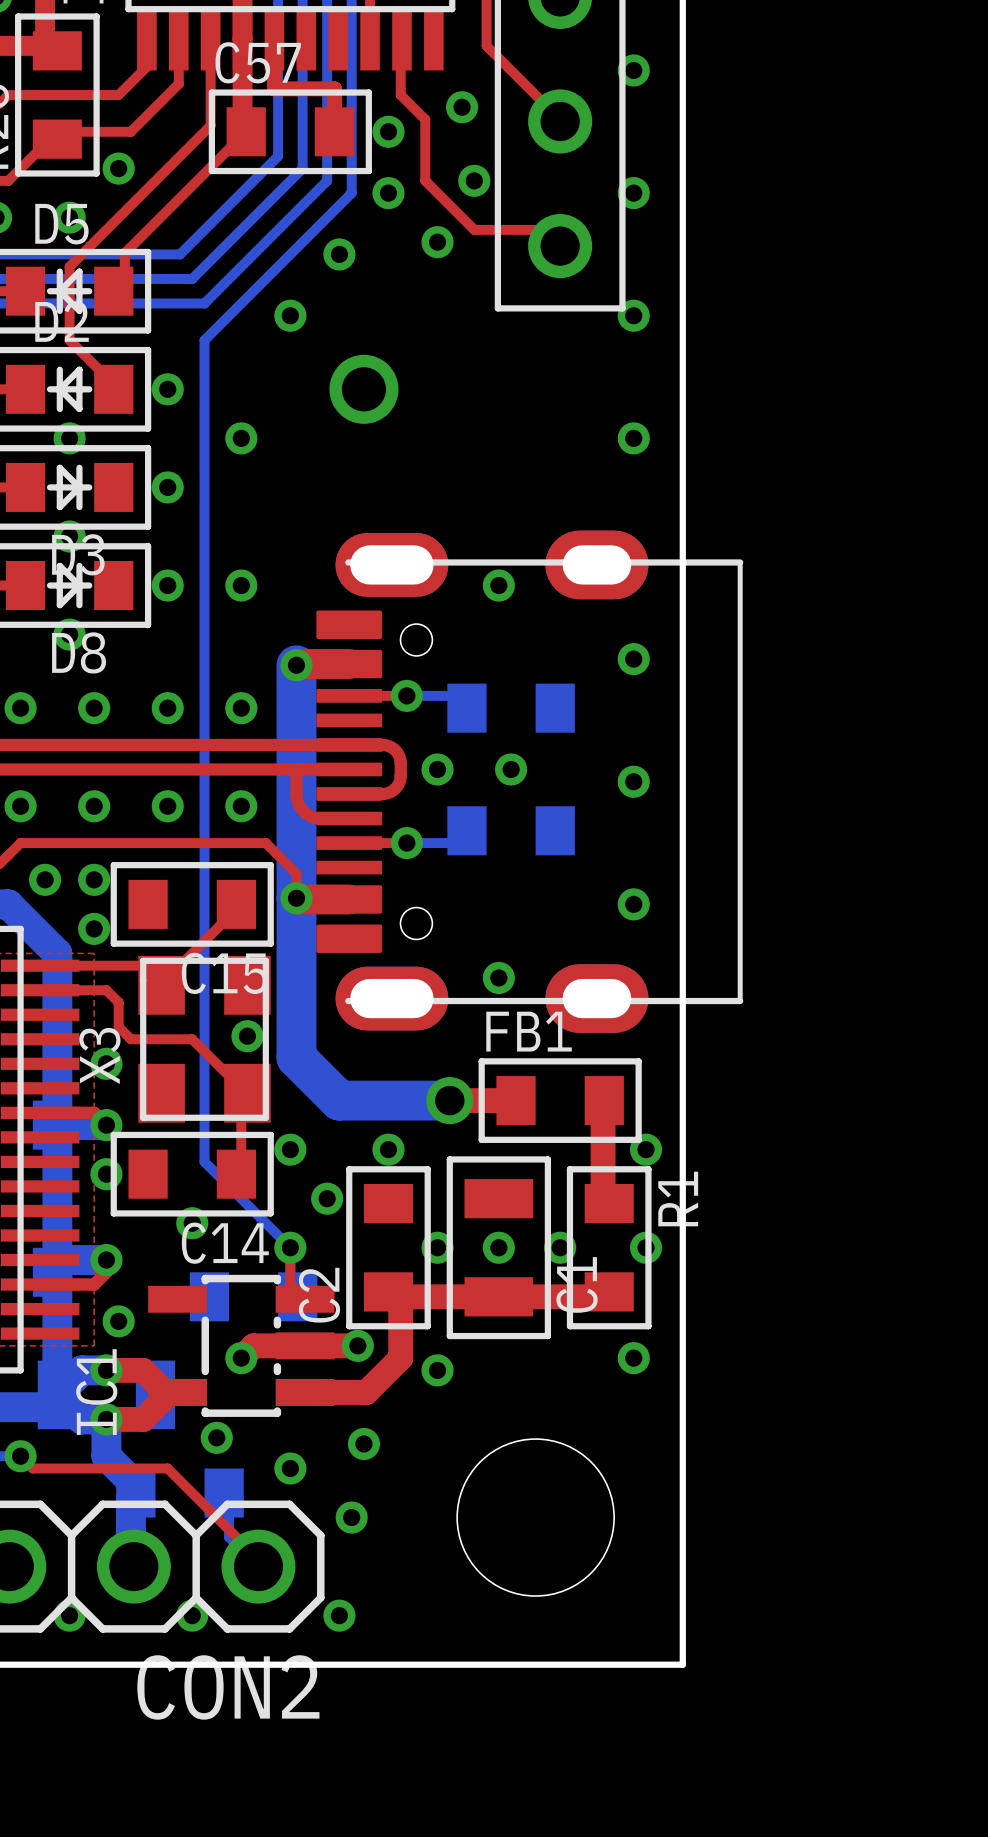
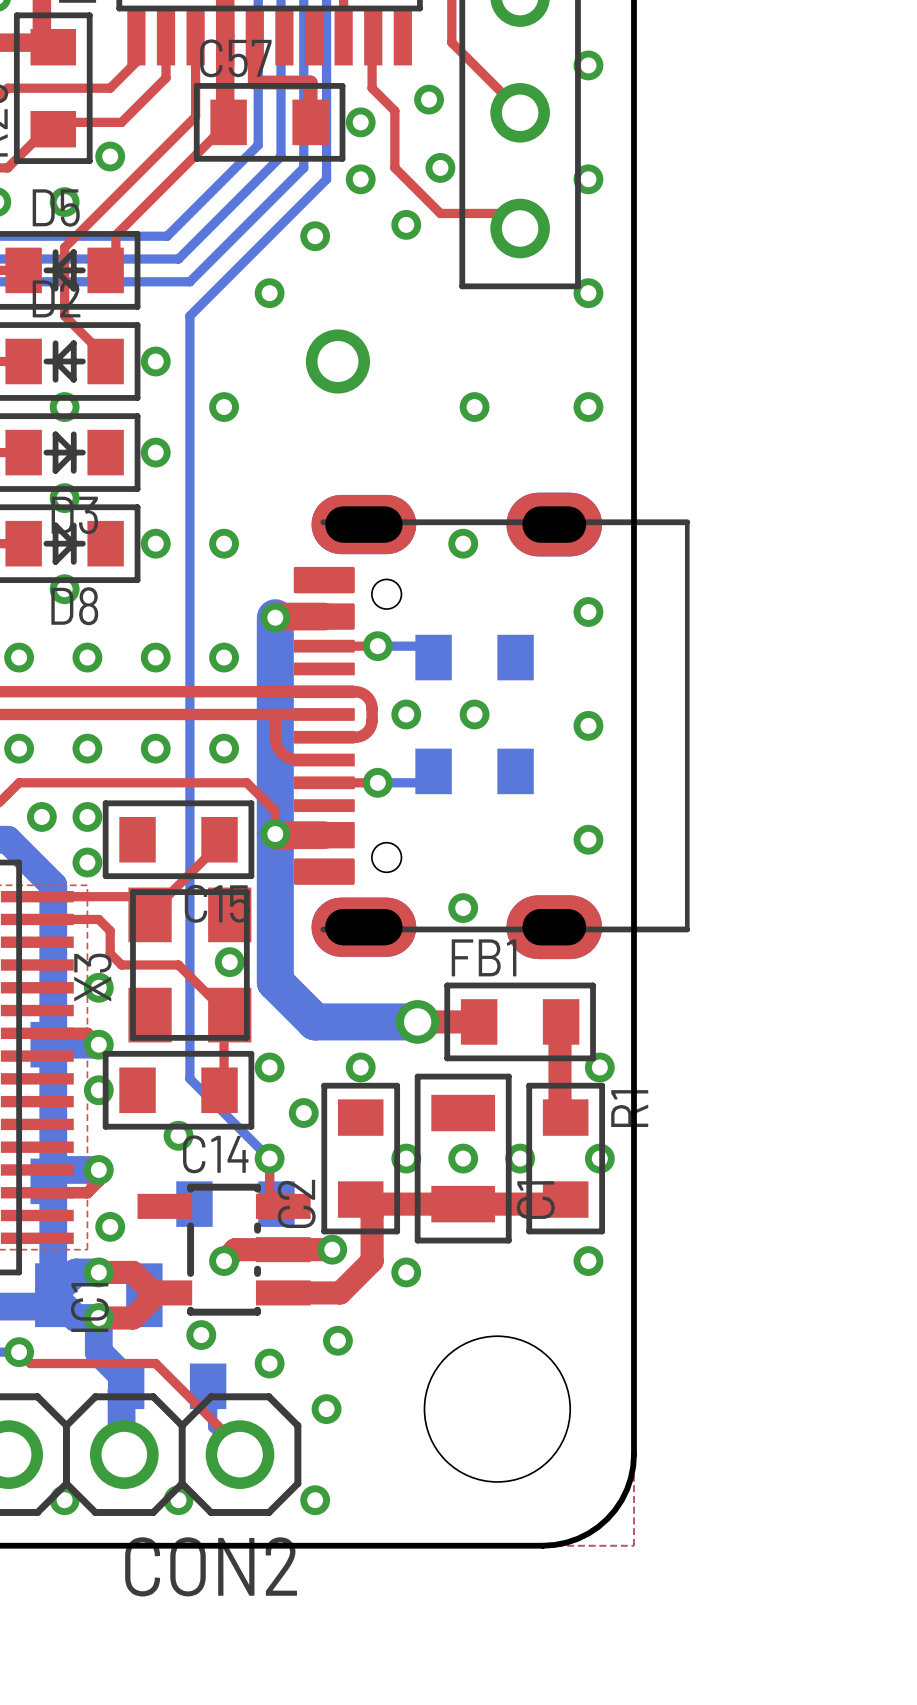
via: none -> (474, 407)
board edge: (682, 1566) (682, 1664) (584, 1664) -> (633, 1454) (630, 1478) (627, 1489) (621, 1500) (607, 1519) (588, 1533) (577, 1538) (566, 1542) (542, 1545)

